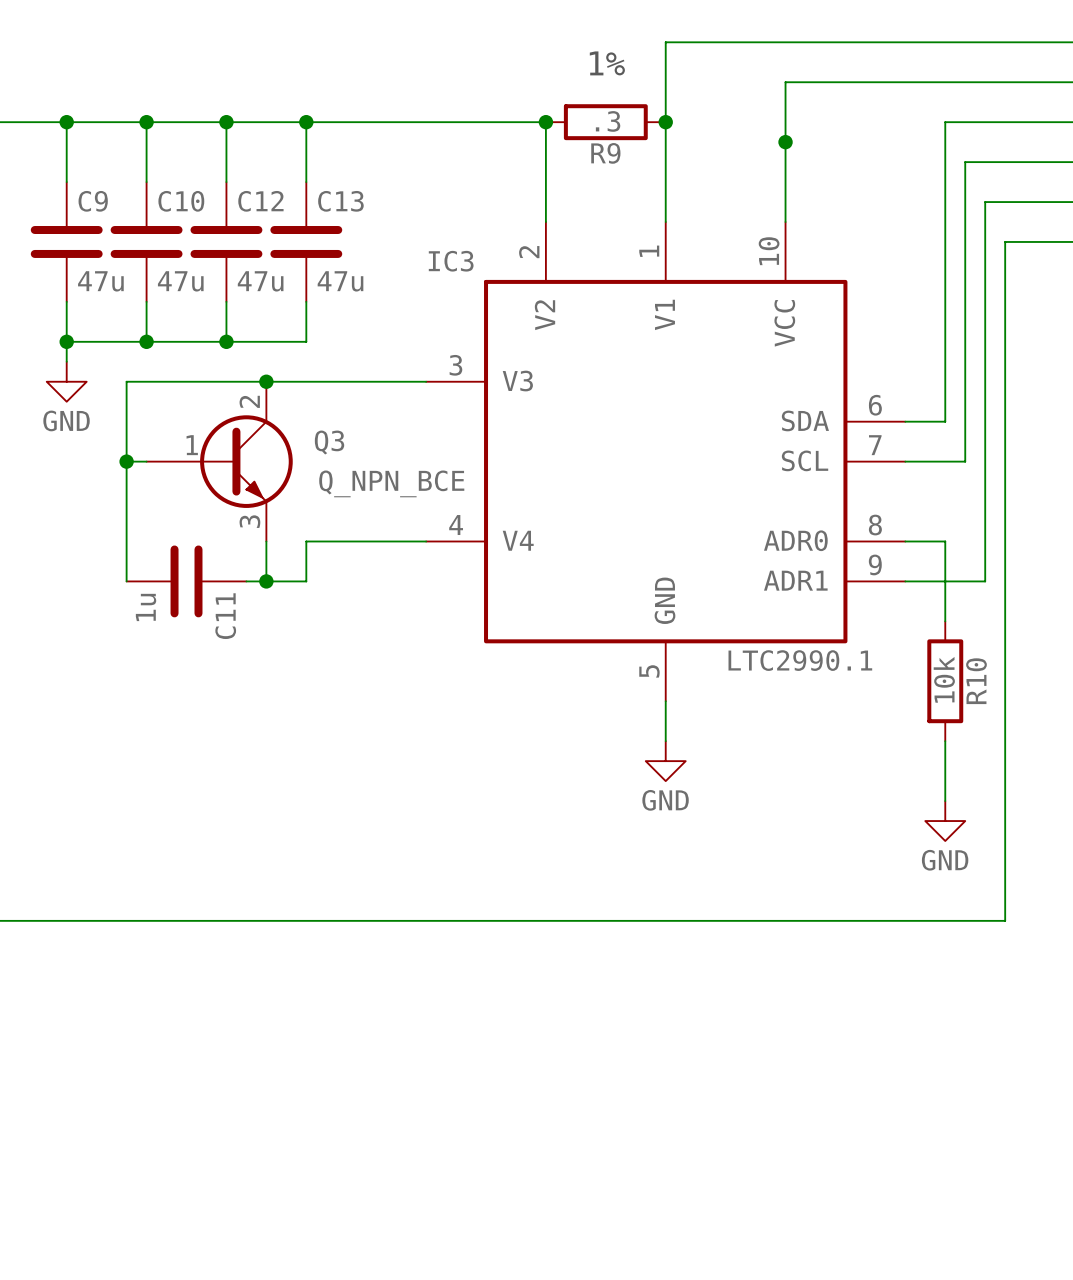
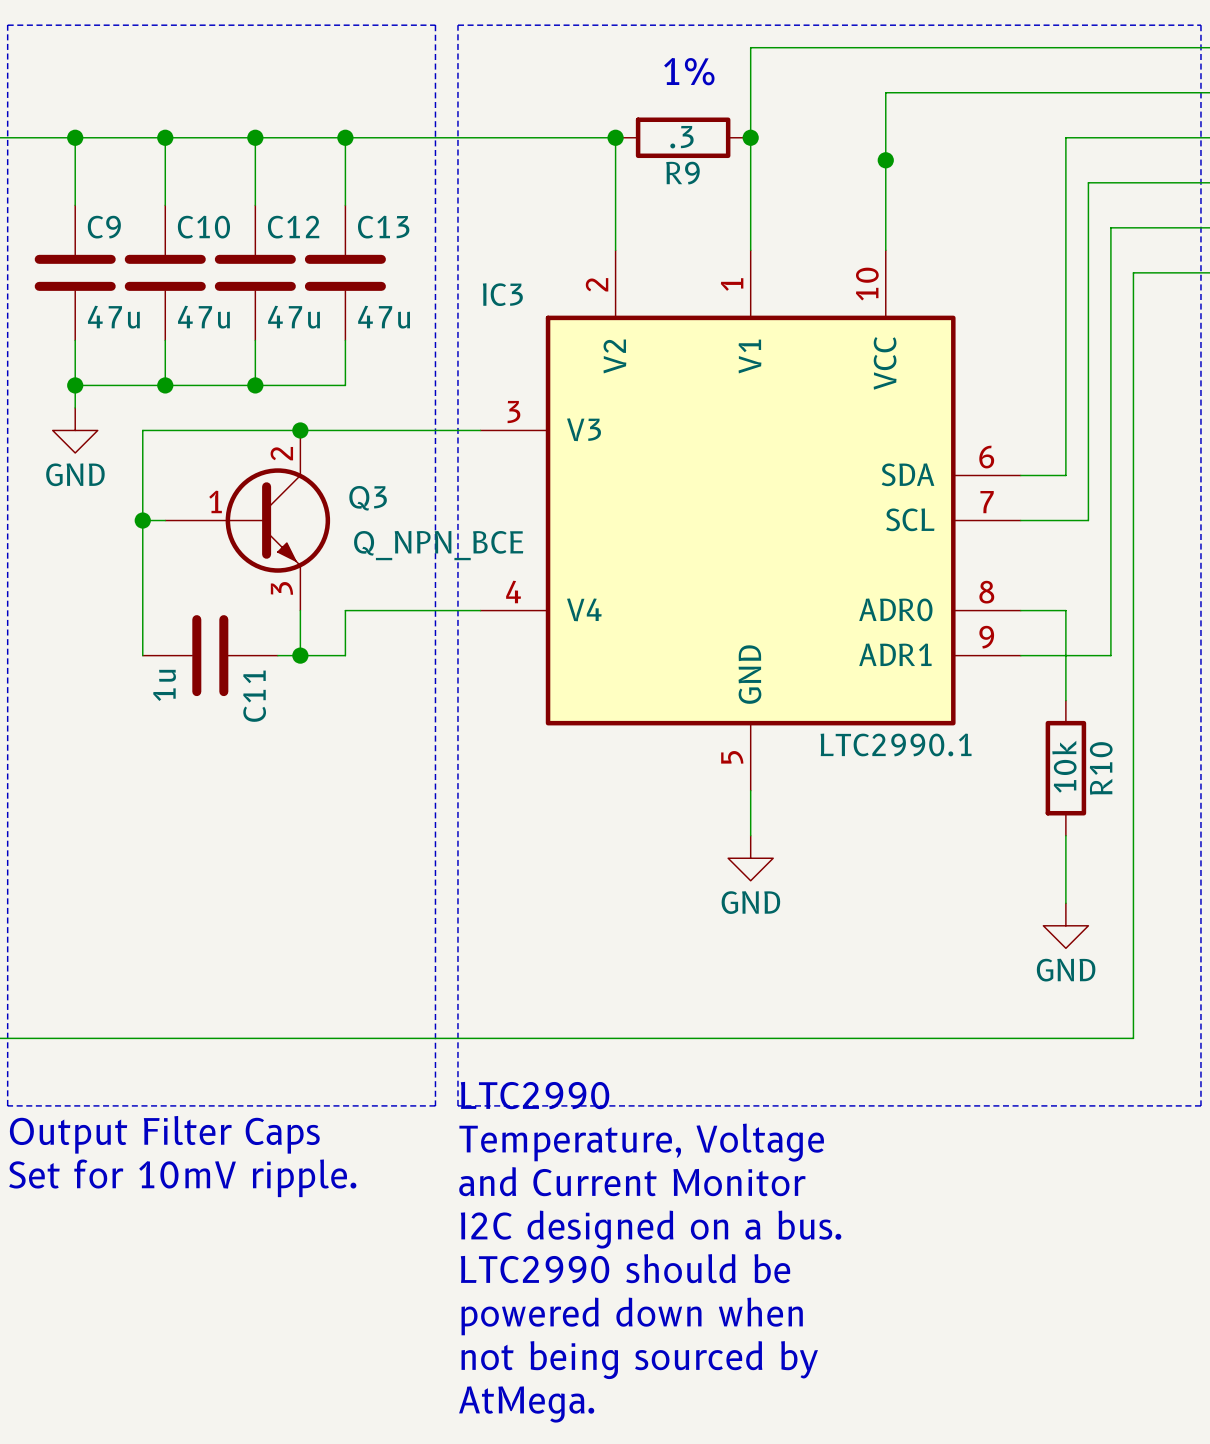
line: none -> (7, 25) (435, 25) (435, 1105) (7, 1105) (7, 25)
line: none -> (457, 25) (1200, 25) (1200, 1105) (457, 1105) (457, 25)
text: none -> LTC2990 (535, 1095)
text: none -> Output Filter Caps (164, 1134)
text: none -> Temperature, Voltage (641, 1142)
text: none -> Set for 10mV ripple. (182, 1178)
text: none -> and Current Monitor (632, 1181)
text: none -> I2C designed on a bus. (651, 1229)
text: none -> LTC2990 should be (625, 1268)
text: none -> powered down when (632, 1316)
text: none -> not being sourced by (639, 1360)
text: none -> AtMega. (526, 1404)

